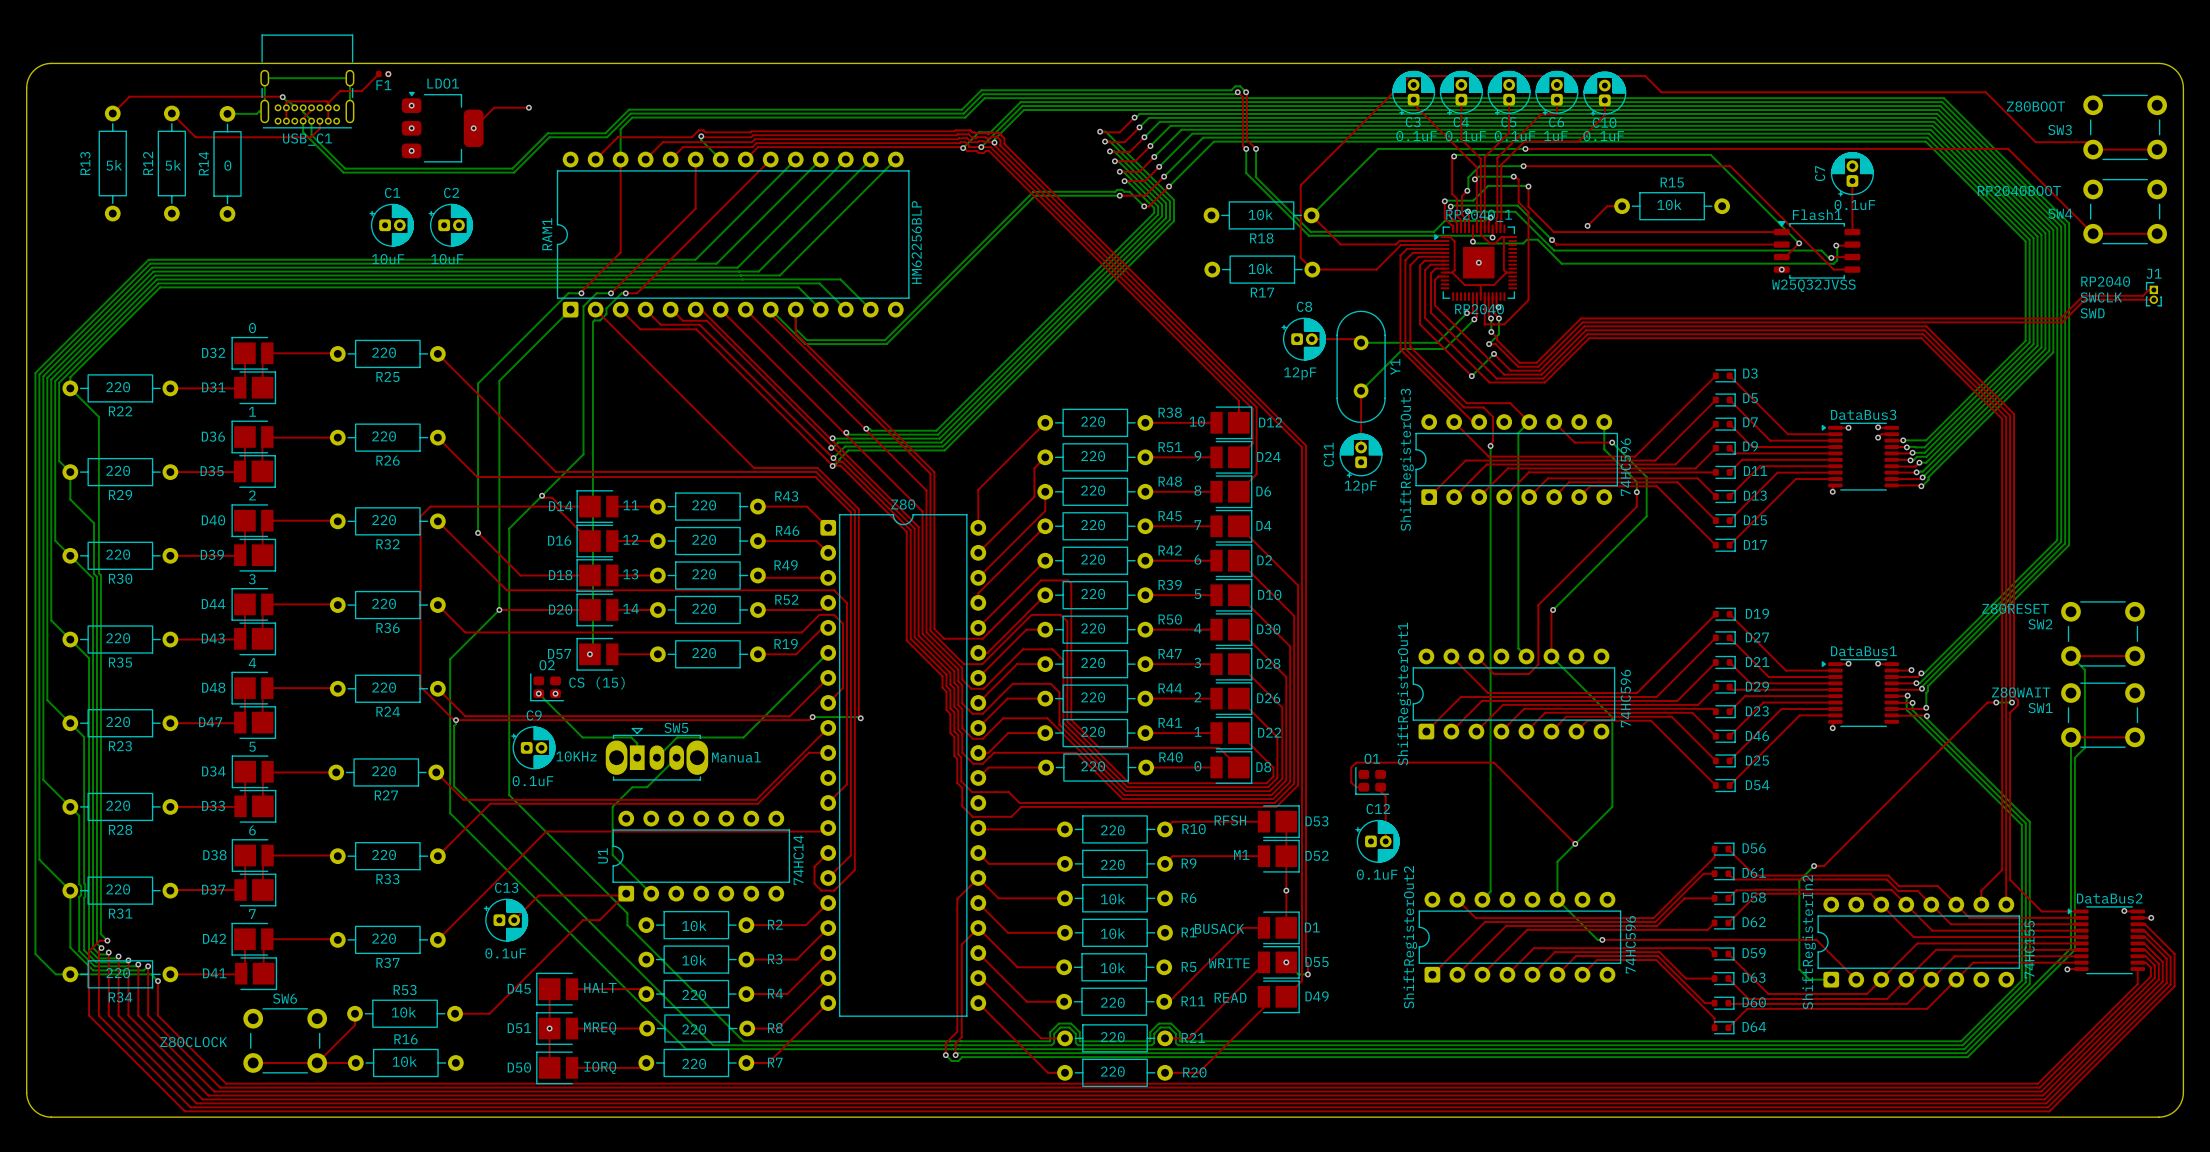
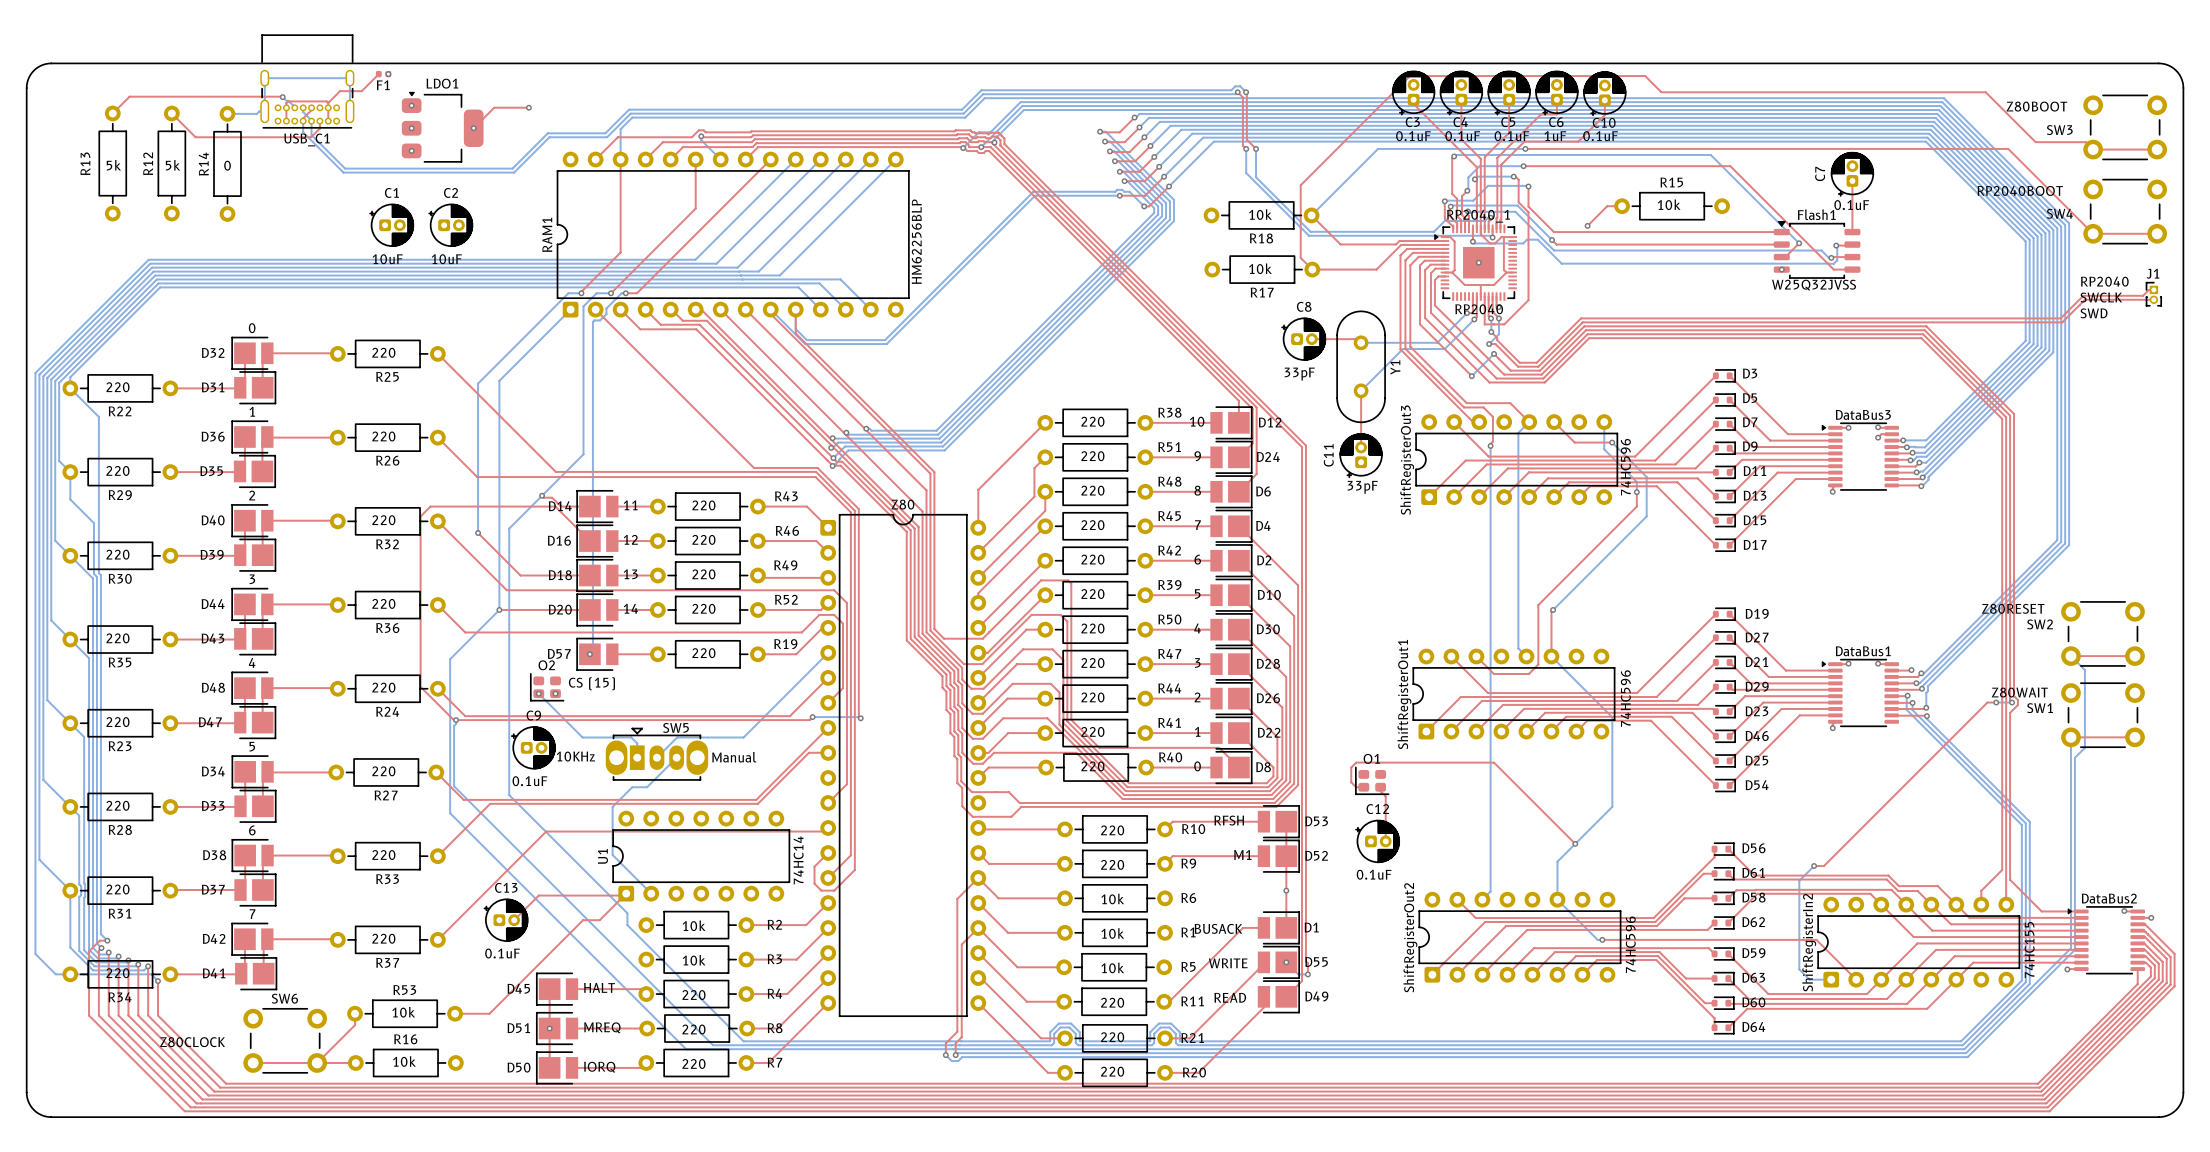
text: 12pF (1300, 373) -> 33pF (1299, 374)
text: 12pF (1360, 486) -> 33pF (1362, 487)

